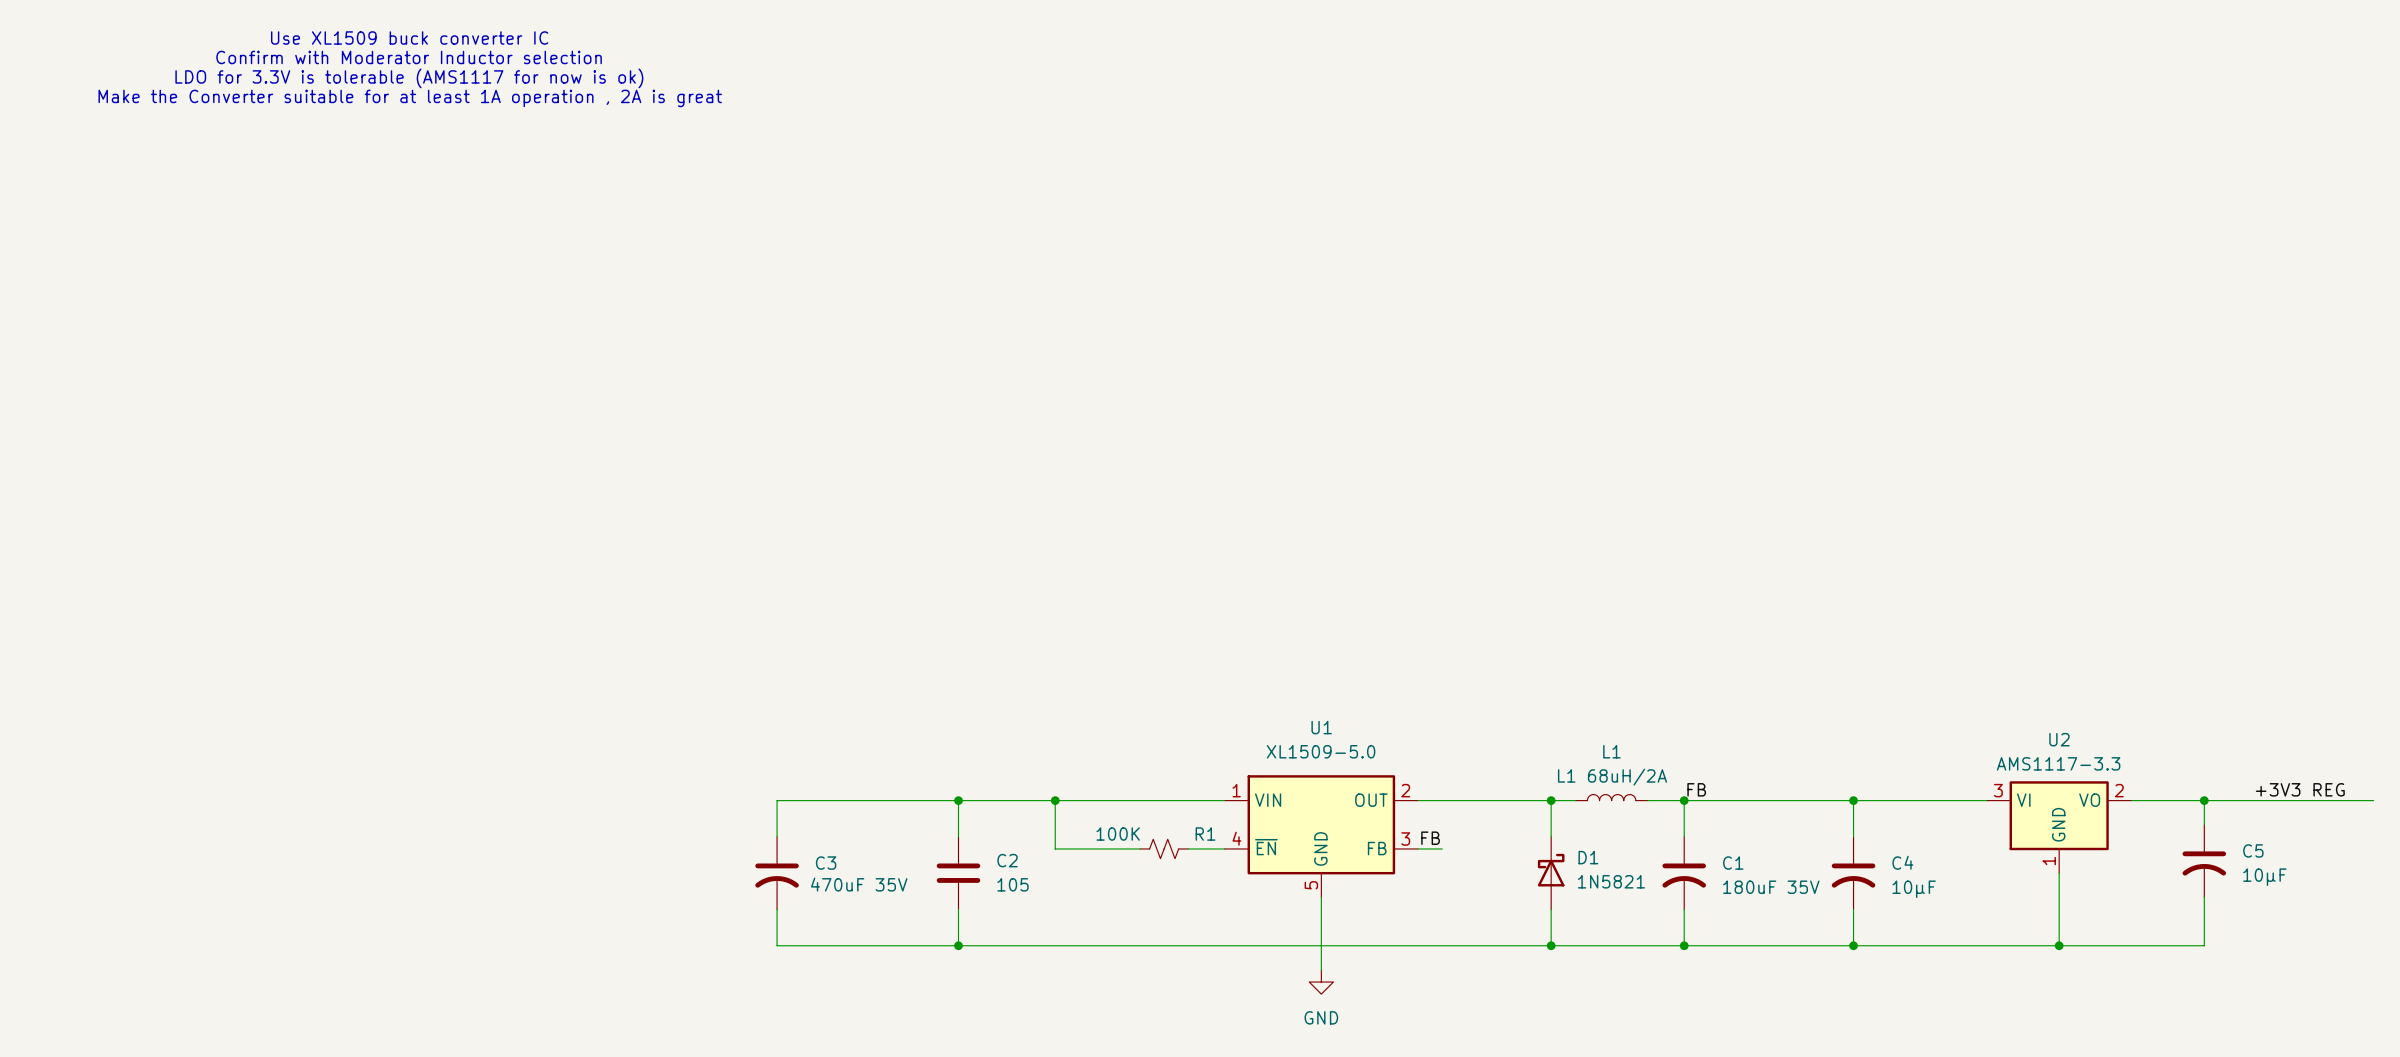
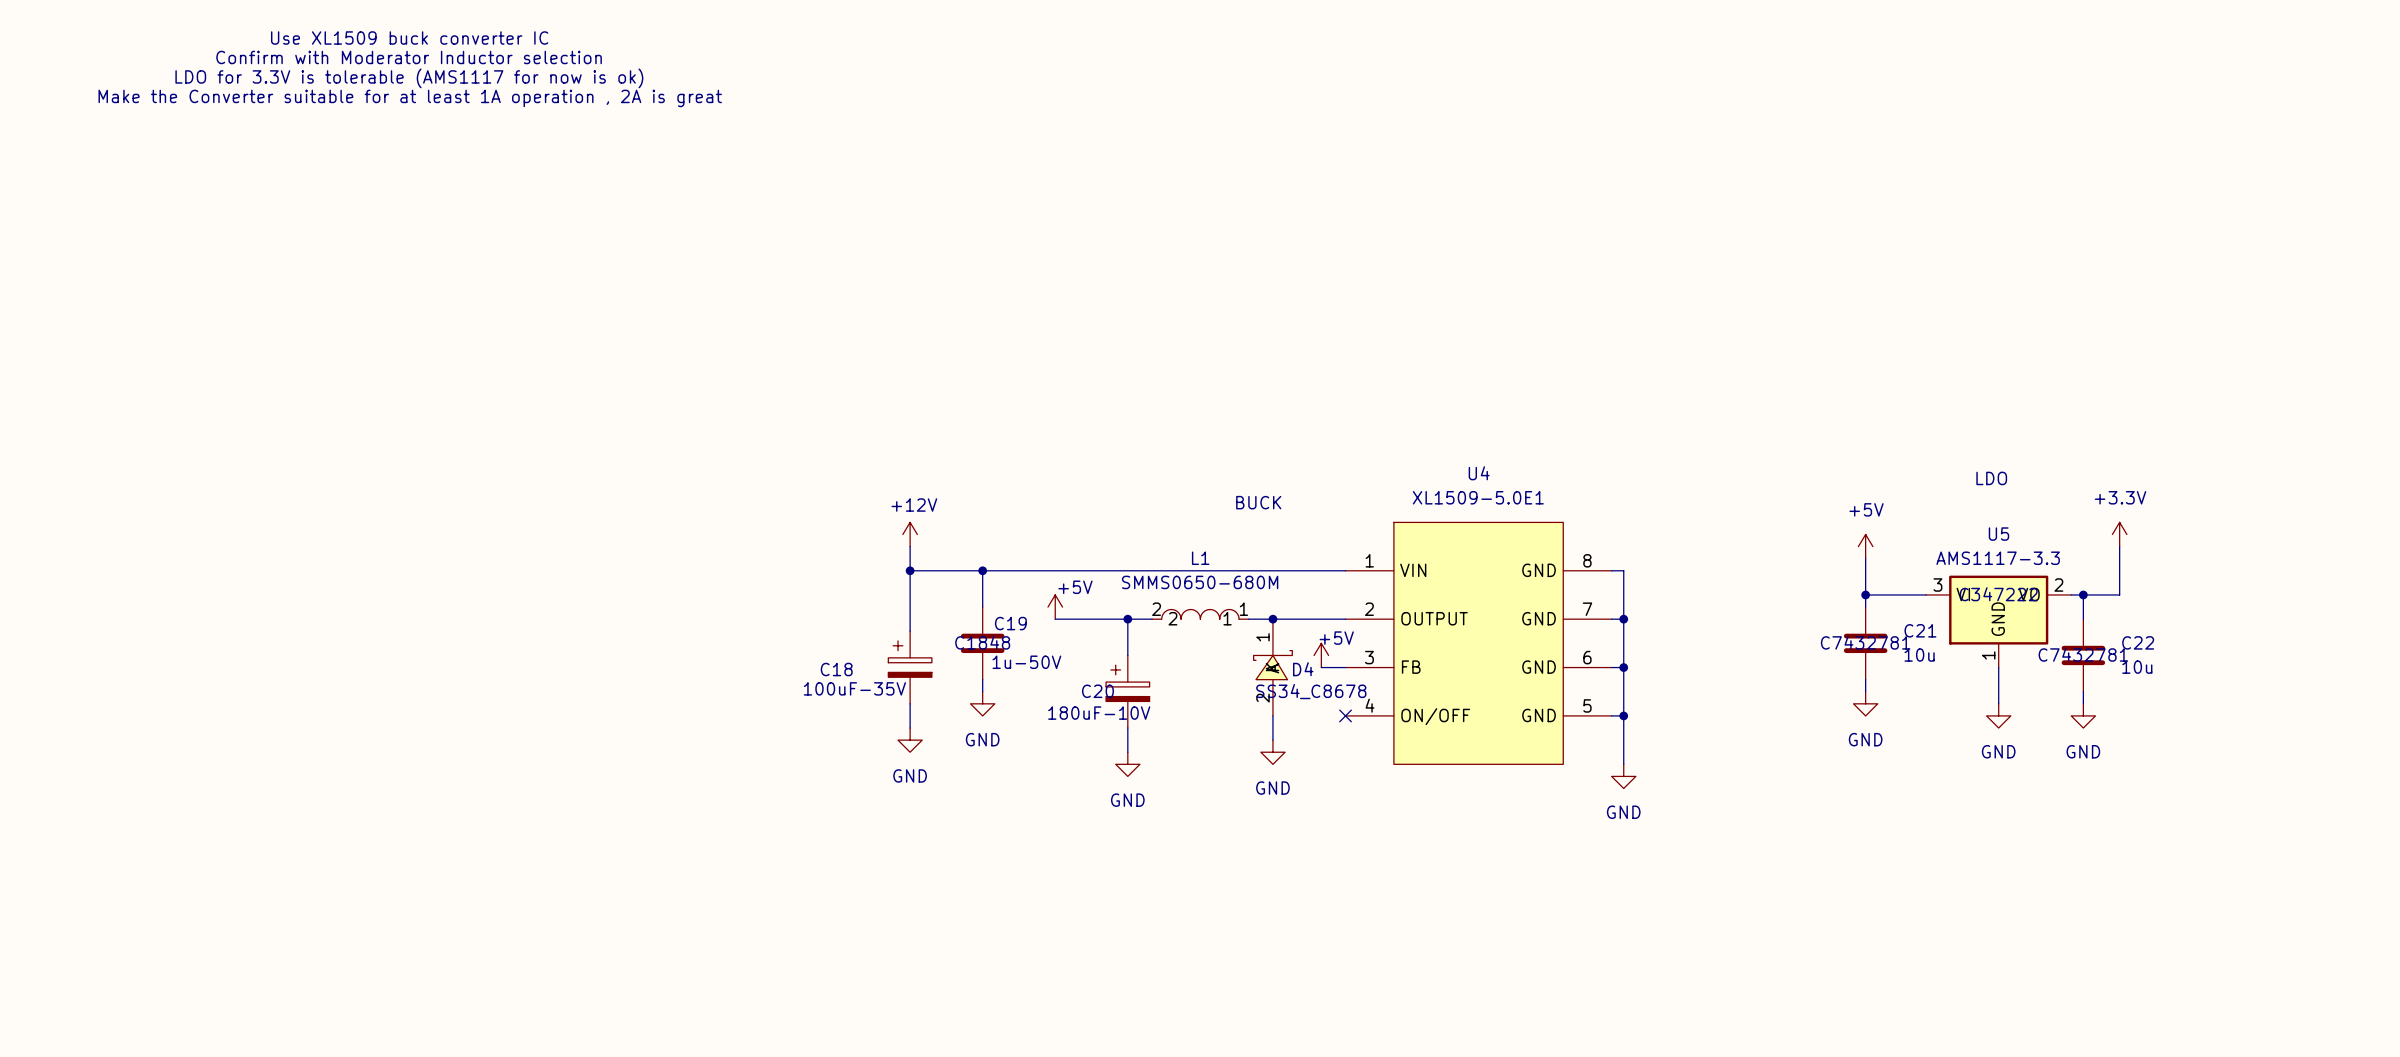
text: none -> LDO (1991, 478)
text: none -> BUCK (1258, 502)
power symbol: none -> +12V (910, 534)
power symbol: none -> +3.3V (2119, 534)
wire: none -> (910, 546) (910, 631)
power symbol: none -> +5V (1865, 546)
wire: none -> (2119, 546) (2119, 594) (2071, 594)
wire: none -> (1865, 558) (1865, 607)
wire: none -> (910, 570) (1345, 570)
junction: none -> (910, 570)
junction: none -> (982, 570)
wire: none -> (1611, 570) (1623, 570) (1623, 764)
wire: none -> (1865, 594) (1926, 594)
junction: none -> (1865, 594)
wire: none -> (2083, 594) (2083, 619)
junction: none -> (2083, 594)
power symbol: none -> +5V (1055, 607)
wire: none -> (1055, 619) (1152, 619)
wire: none -> (1127, 619) (1127, 655)
junction: none -> (1127, 619)
wire: none -> (1248, 619) (1345, 619)
junction: none -> (1272, 619)
wire: none -> (1611, 619) (1623, 619)
junction: none -> (1623, 619)
U5: none -> AMS1117-3.3 (1998, 621)
C19: none -> 1u-50V (982, 643)
U4: none -> XL1509-5.0E1 (1478, 643)
C21: none -> 10u (1865, 643)
power symbol: none -> +5V (1321, 655)
C22: none -> 10u (2083, 655)
C18: none -> 100uF-35V (910, 667)
D4: none -> SS34_C8678 (1272, 667)
wire: none -> (1611, 667) (1623, 667)
junction: none -> (1623, 667)
wire: none -> (982, 679) (982, 691)
wire: none -> (1865, 679) (1865, 691)
C20: none -> 180uF-10V (1127, 691)
wire: none -> (2083, 691) (2083, 703)
wire: none -> (910, 703) (910, 728)
power symbol: none -> GND (982, 703)
power symbol: none -> GND (1865, 703)
wire: none -> (1272, 715) (1272, 740)
no-connect mark: none -> (1345, 715)
wire: none -> (1611, 715) (1623, 715)
junction: none -> (1623, 715)
power symbol: none -> GND (1998, 715)
power symbol: none -> GND (2083, 715)
wire: none -> (1127, 728) (1127, 752)
power symbol: none -> GND (910, 740)
power symbol: none -> GND (1272, 752)
power symbol: none -> GND (1127, 764)
power symbol: none -> GND (1623, 776)
L1 value: L1 68uH/2A (1612, 777) -> SMMS0650-680M (1200, 582)
label: FB (1696, 789) -> none
label: +3V3 REG (2300, 789) -> none
L1 symbol: [1575, 794, 1648, 801] -> [1152, 609, 1249, 620]
wire: (958, 800) (958, 836) -> (982, 570) (982, 607)
junction: (958, 800) -> none
wire: (1055, 800) (1055, 848) (1139, 848) -> none
junction: (1055, 800) -> none
wire: (1224, 800) (777, 800) (777, 836) -> none
wire: (1418, 800) (1575, 800) -> none
wire: (1551, 800) (1551, 836) -> none
junction: (1551, 800) -> none
wire: (1647, 800) (1986, 800) -> none
wire: (1684, 800) (1684, 836) -> none
junction: (1684, 800) -> none
wire: (1853, 800) (1853, 836) -> (1998, 667) (1998, 703)
junction: (1853, 800) -> none
wire: (2131, 800) (2373, 800) -> none
wire: (2204, 800) (2204, 824) -> none
junction: (2204, 800) -> none
U2: AMS1117-3.3 (2059, 827) -> none
U1: XL1509-5.0 (1321, 836) -> none
label: FB (1430, 838) -> none
R1: 100K (1164, 848) -> none
wire: (1188, 848) (1224, 848) -> none
wire: (1418, 848) (1442, 848) -> (1321, 667) (1345, 667)
C5: 10µF (2204, 861) -> none
C3: 470uF 35V (777, 873) -> none
C2: 105 (958, 873) -> none
D1: 1N5821 (1551, 873) -> none
C1: 180uF 35V (1684, 873) -> none
C4: 10µF (1853, 873) -> none
wire: (2059, 873) (2059, 945) -> none
wire: (1321, 897) (1321, 969) -> none
wire: (2204, 897) (2204, 945) (777, 945) (777, 909) -> none
wire: (958, 909) (958, 945) -> none
wire: (1551, 909) (1551, 945) -> none
wire: (1684, 909) (1684, 945) -> none
wire: (1853, 909) (1853, 945) -> none
junction: (958, 945) -> none
junction: (1551, 945) -> none
junction: (1684, 945) -> none
junction: (1853, 945) -> none
junction: (2059, 945) -> none
power symbol: GND (1321, 982) -> none

